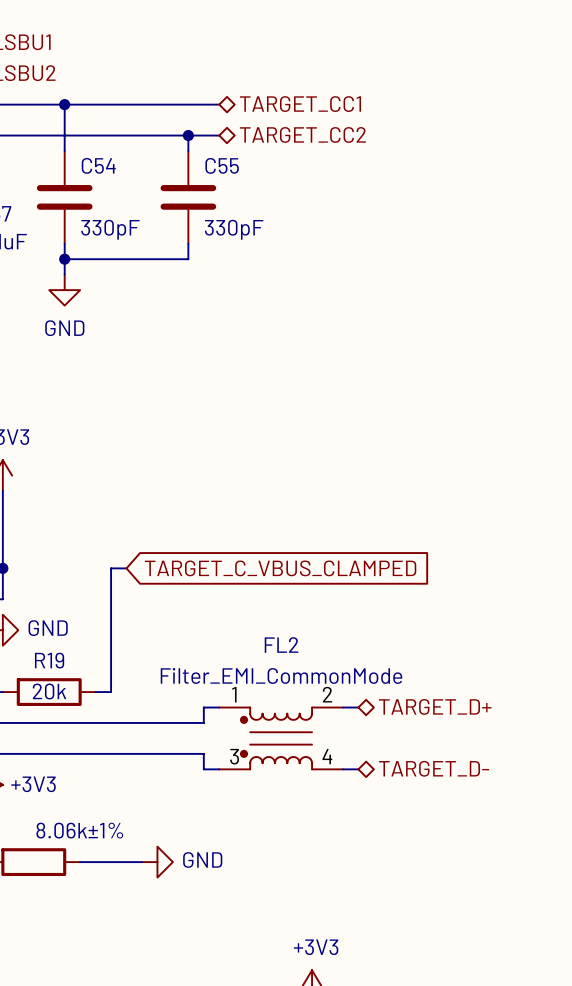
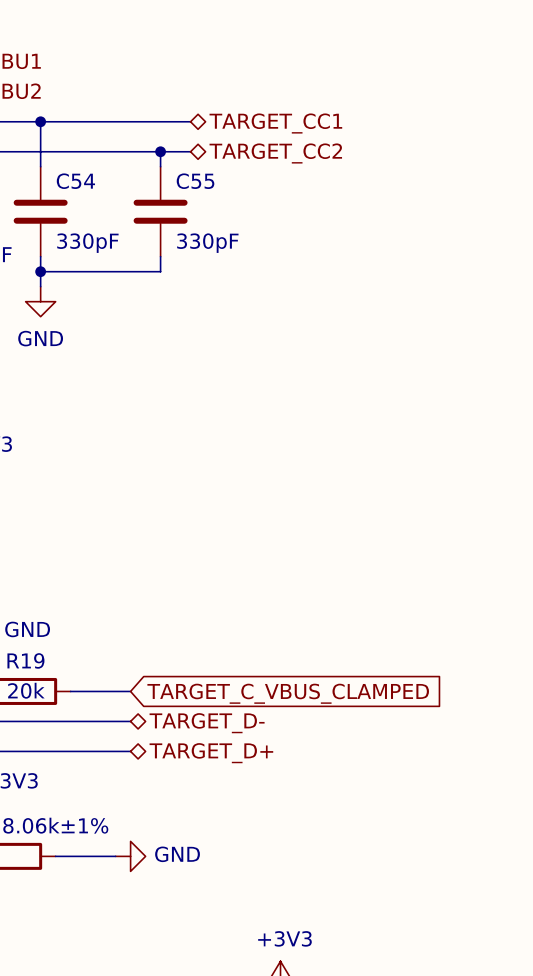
wire: (126, 568) (111, 568) (111, 692) -> (130, 691) (85, 691)
global label position: TARGET_C_VBUS_CLAMPED (280, 568) -> TARGET_C_VBUS_CLAMPED (288, 693)
hierarchical label position: TARGET_D+ (435, 706) -> TARGET_D+ (211, 753)
wire: (219, 707) (203, 707) (203, 722) (157, 722) -> none
FL2: Filter_EMI_CommonMode (281, 738) -> none
wire: (157, 753) (203, 753) (203, 769) (219, 769) -> none
hierarchical label position: TARGET_D- (434, 768) -> TARGET_D- (207, 723)
wire: (342, 769) (358, 769) -> none

